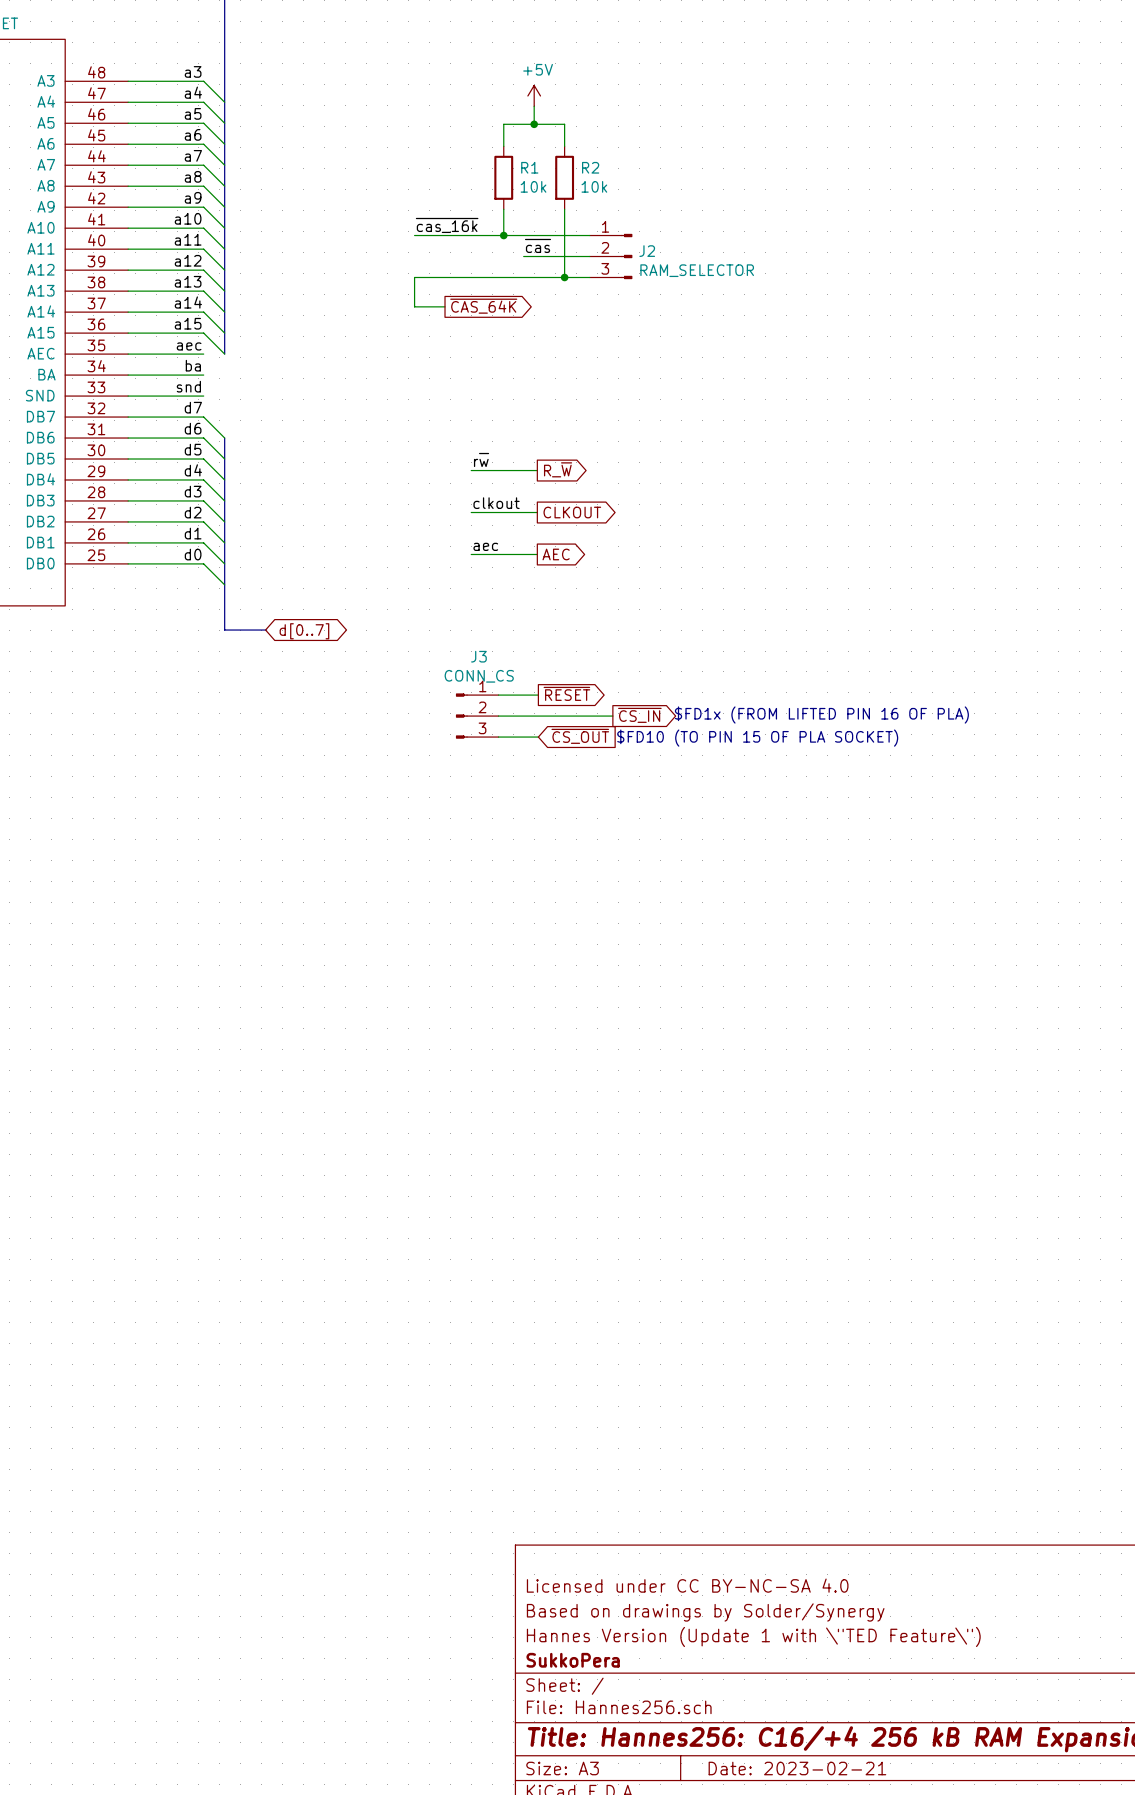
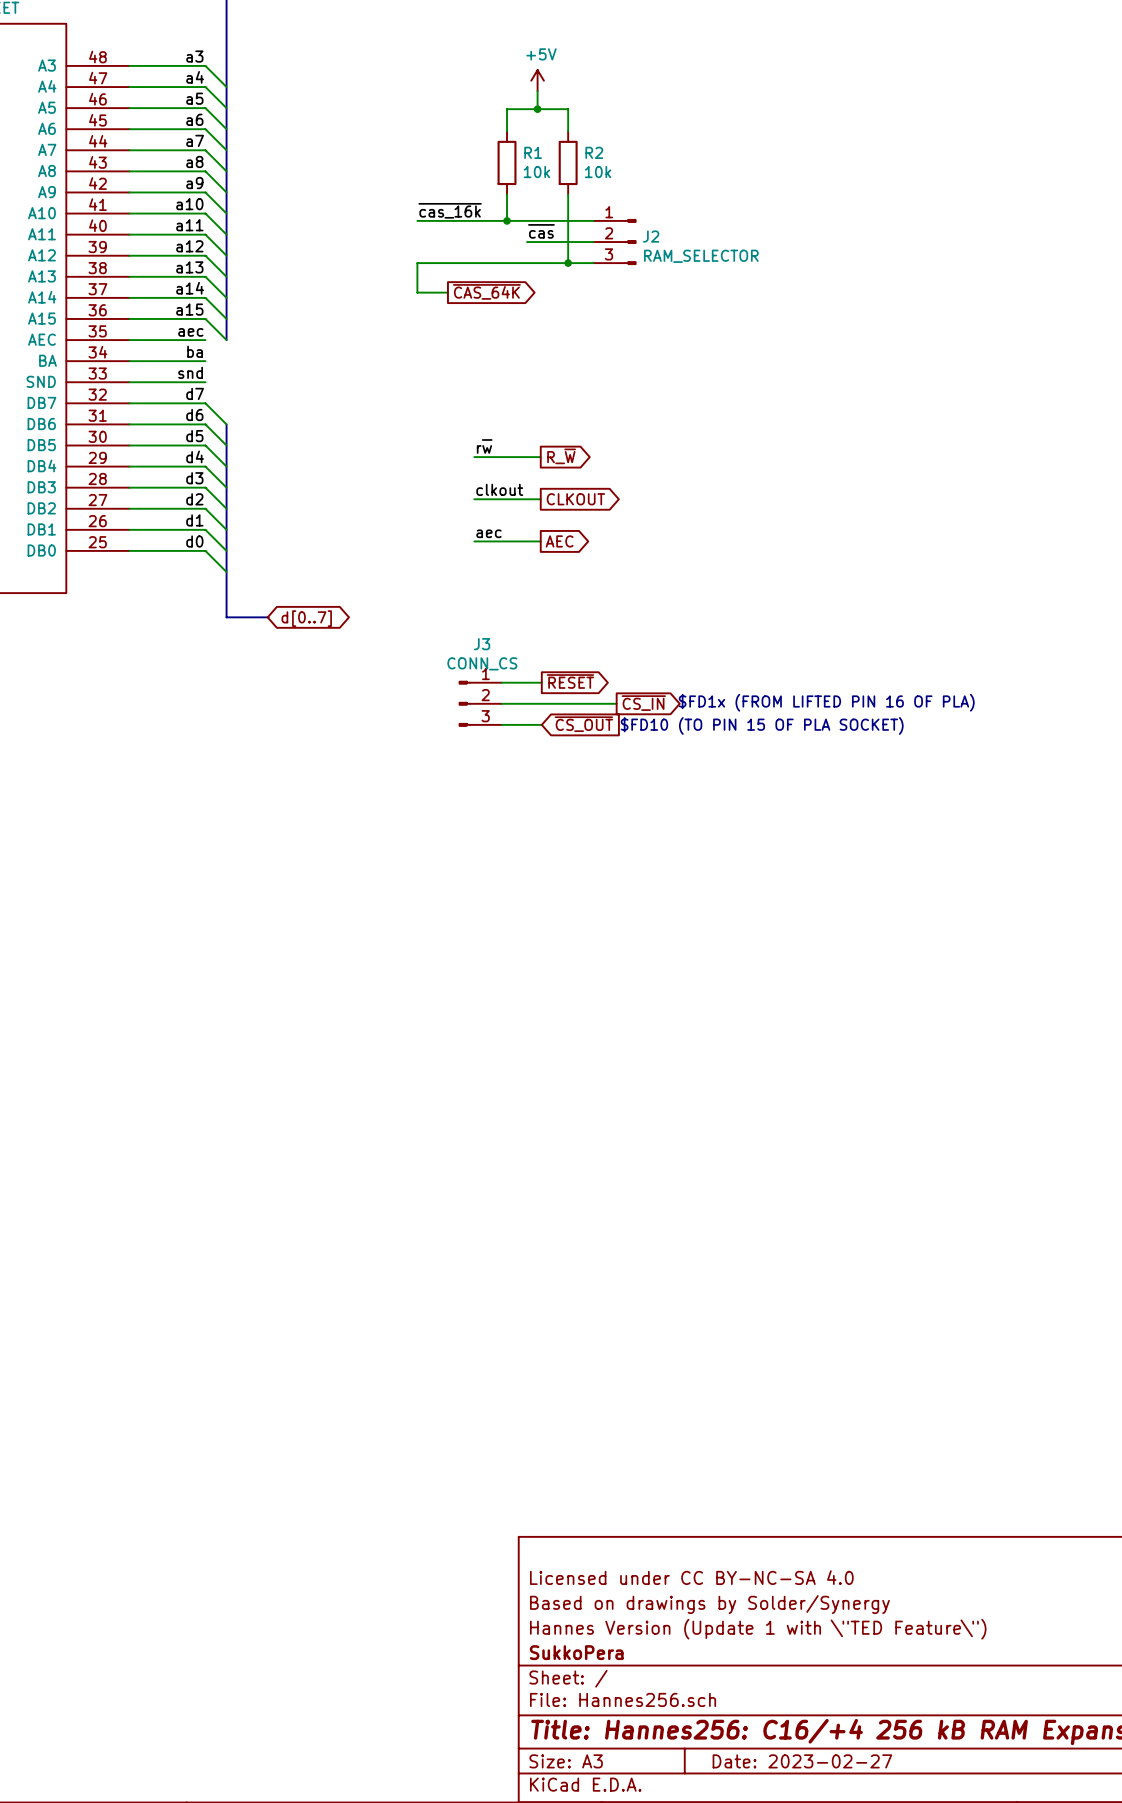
title block: Date: 2023-02-21 (797, 1768) -> Date: 2023-02-27 (802, 1761)

